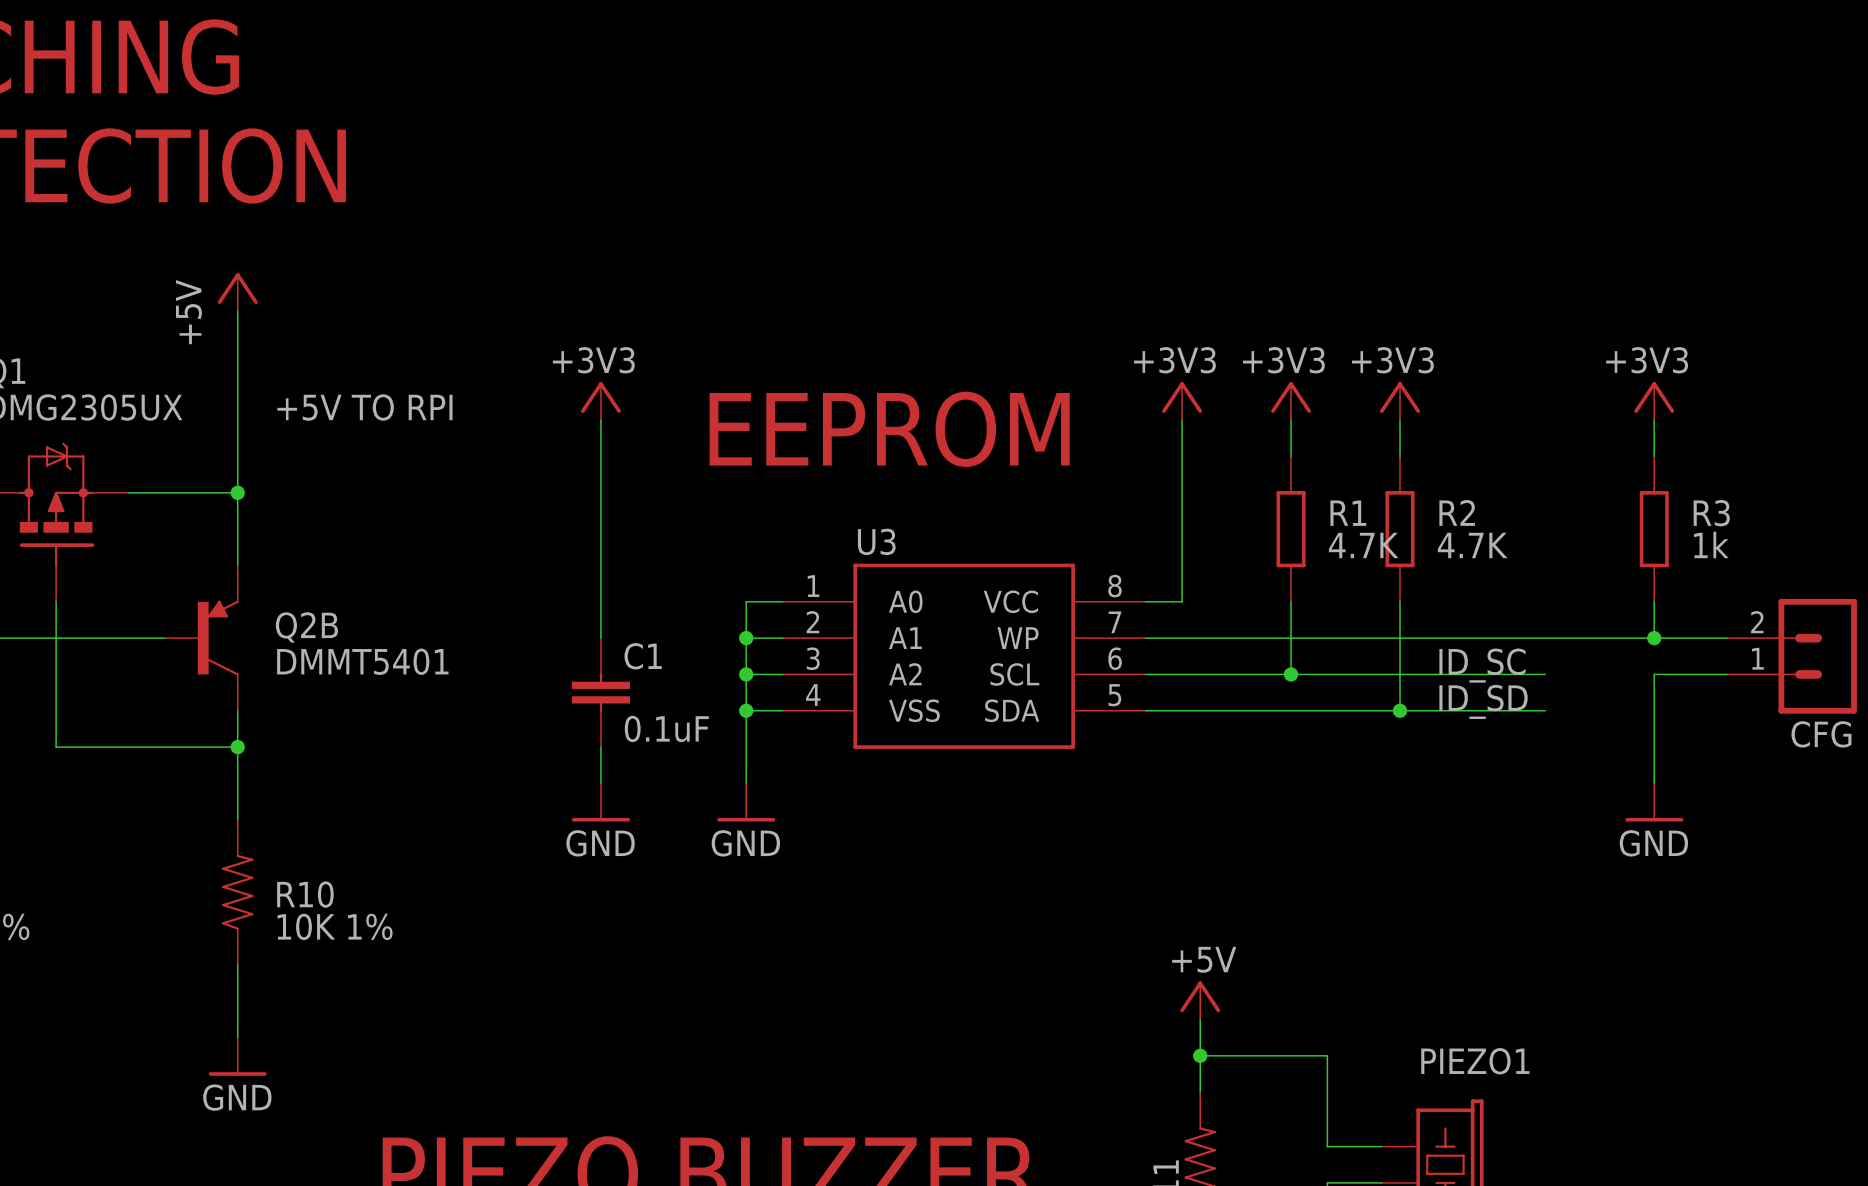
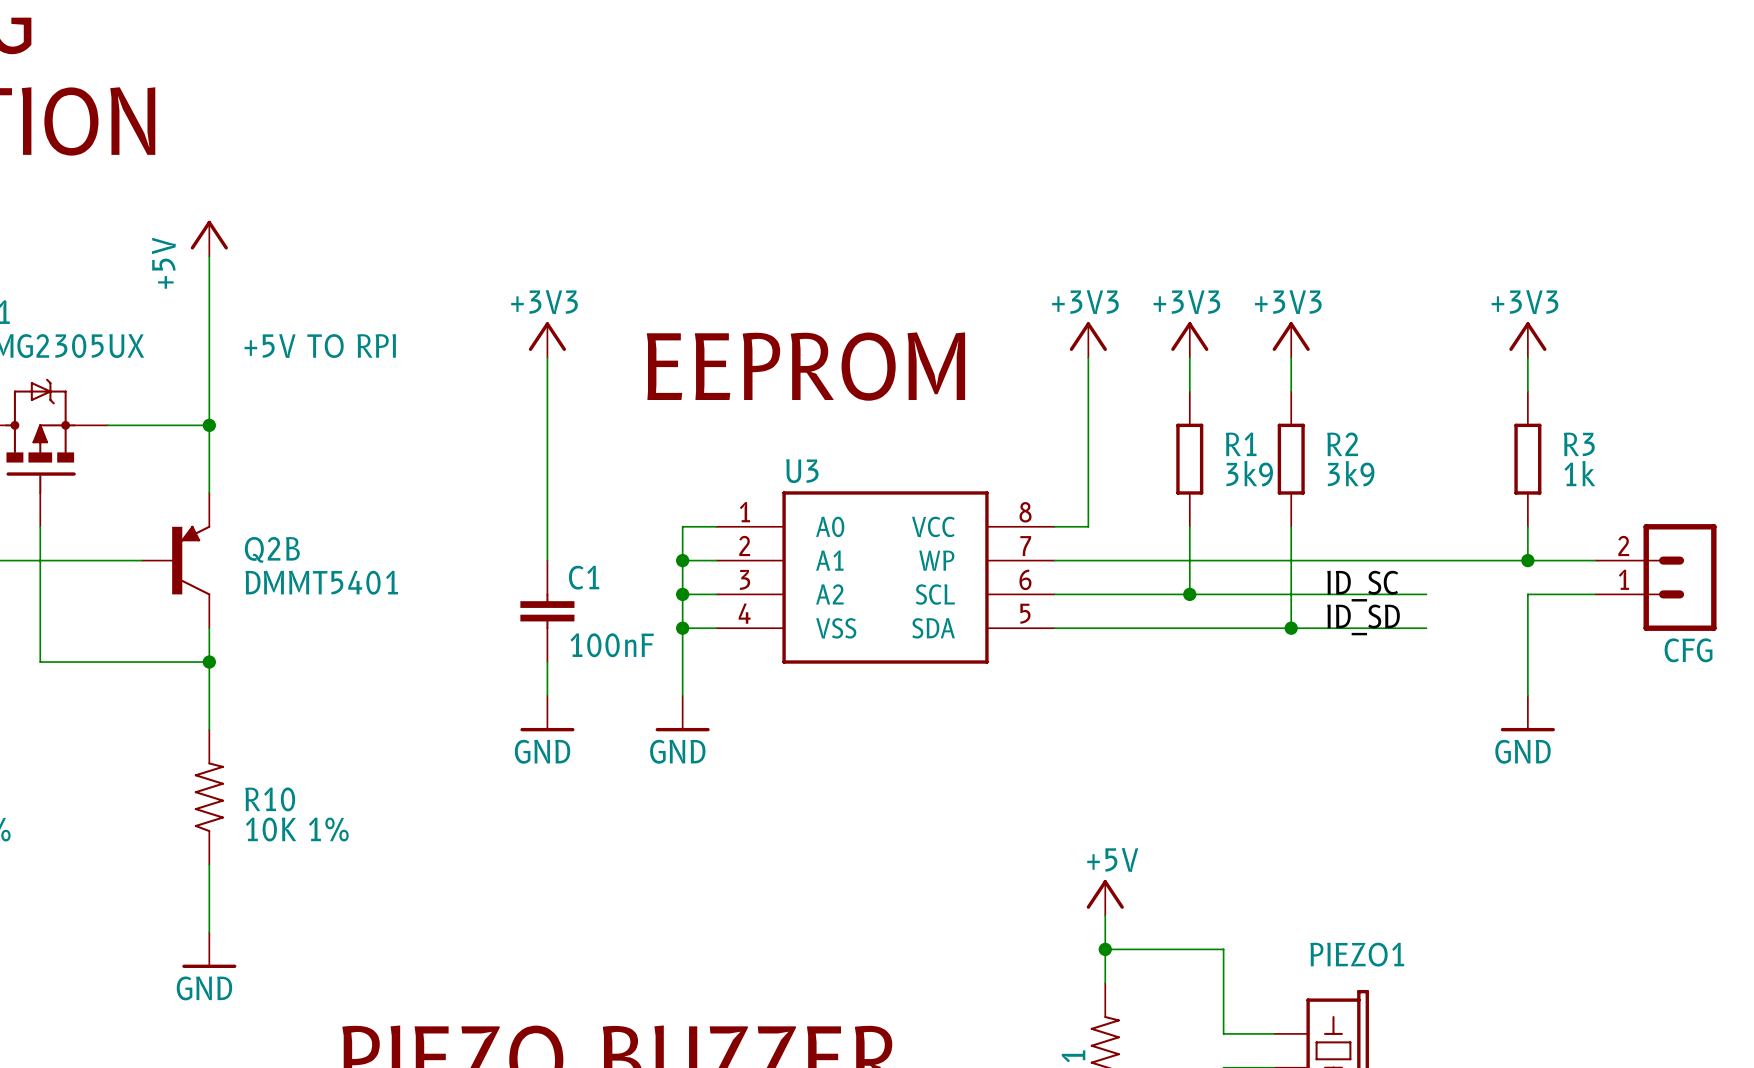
R1 value: 4.7K (1363, 545) -> 3k9 (1249, 473)
R2 value: 4.7K (1472, 545) -> 3k9 (1351, 473)
C1 value: 0.1uF (666, 728) -> 100nF (612, 645)

